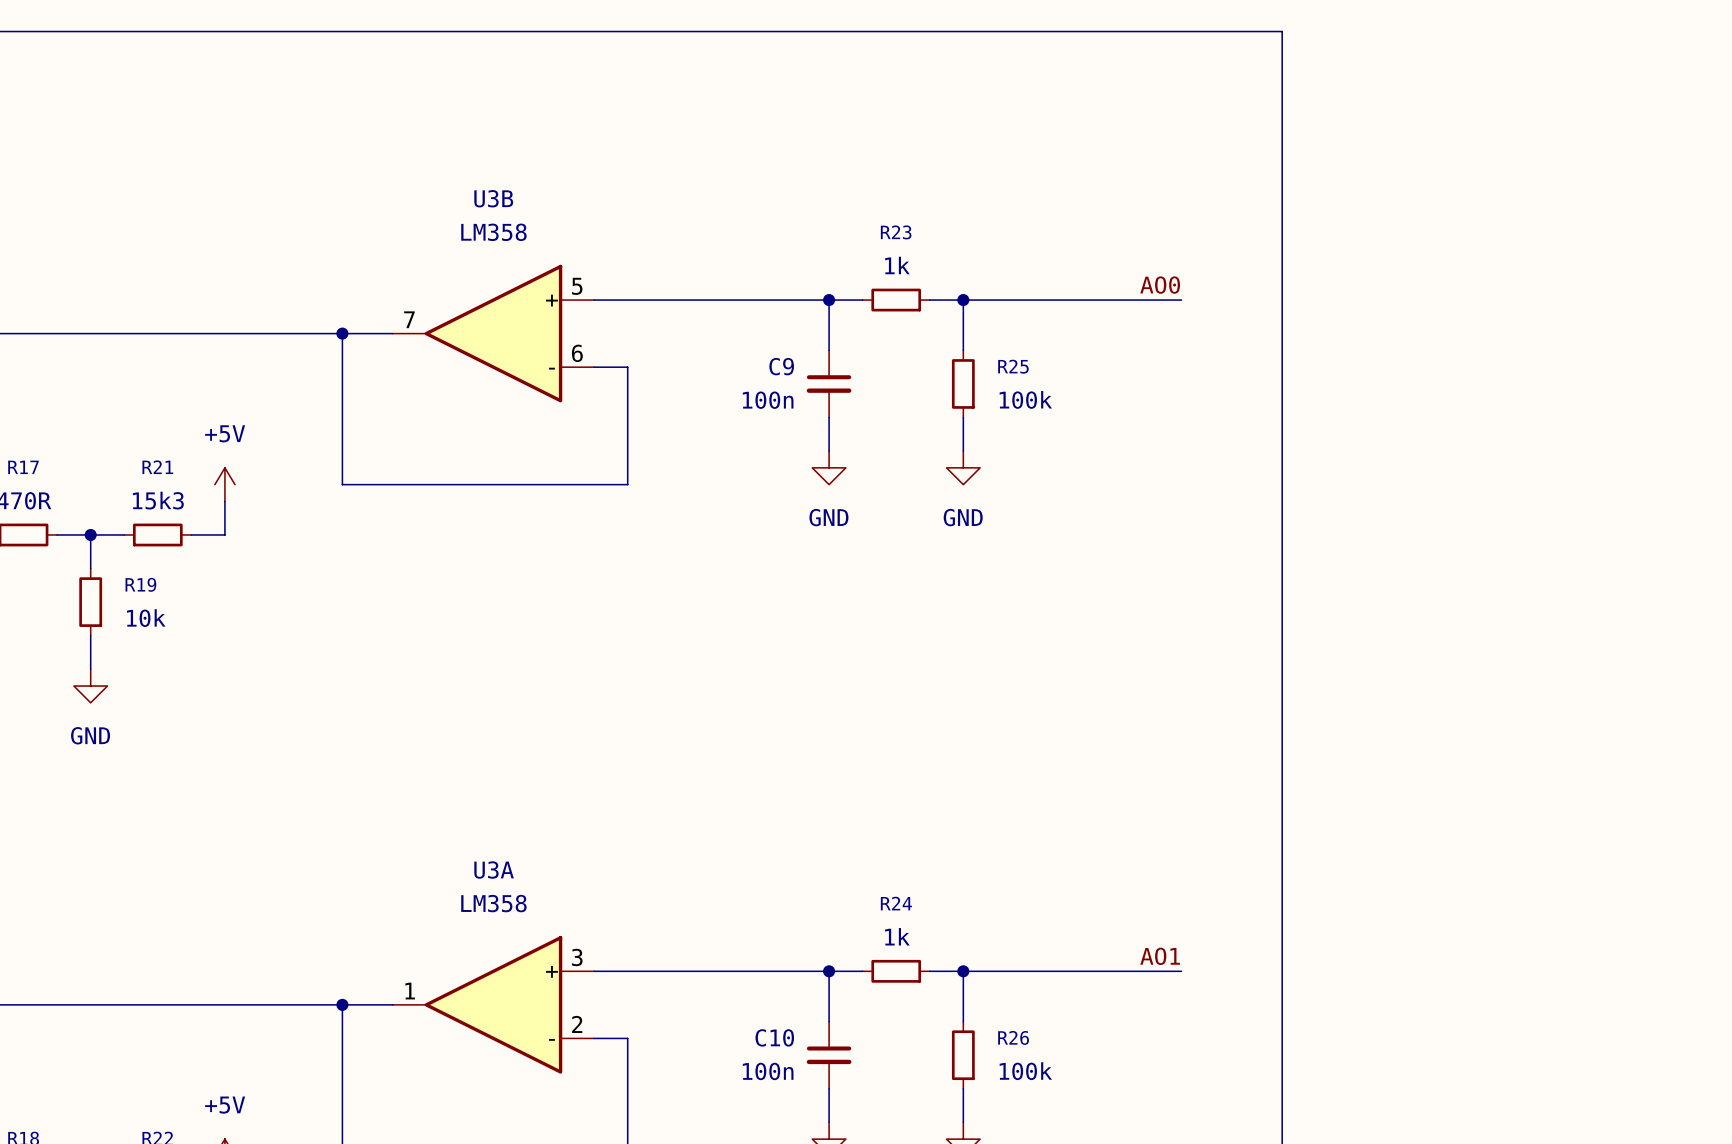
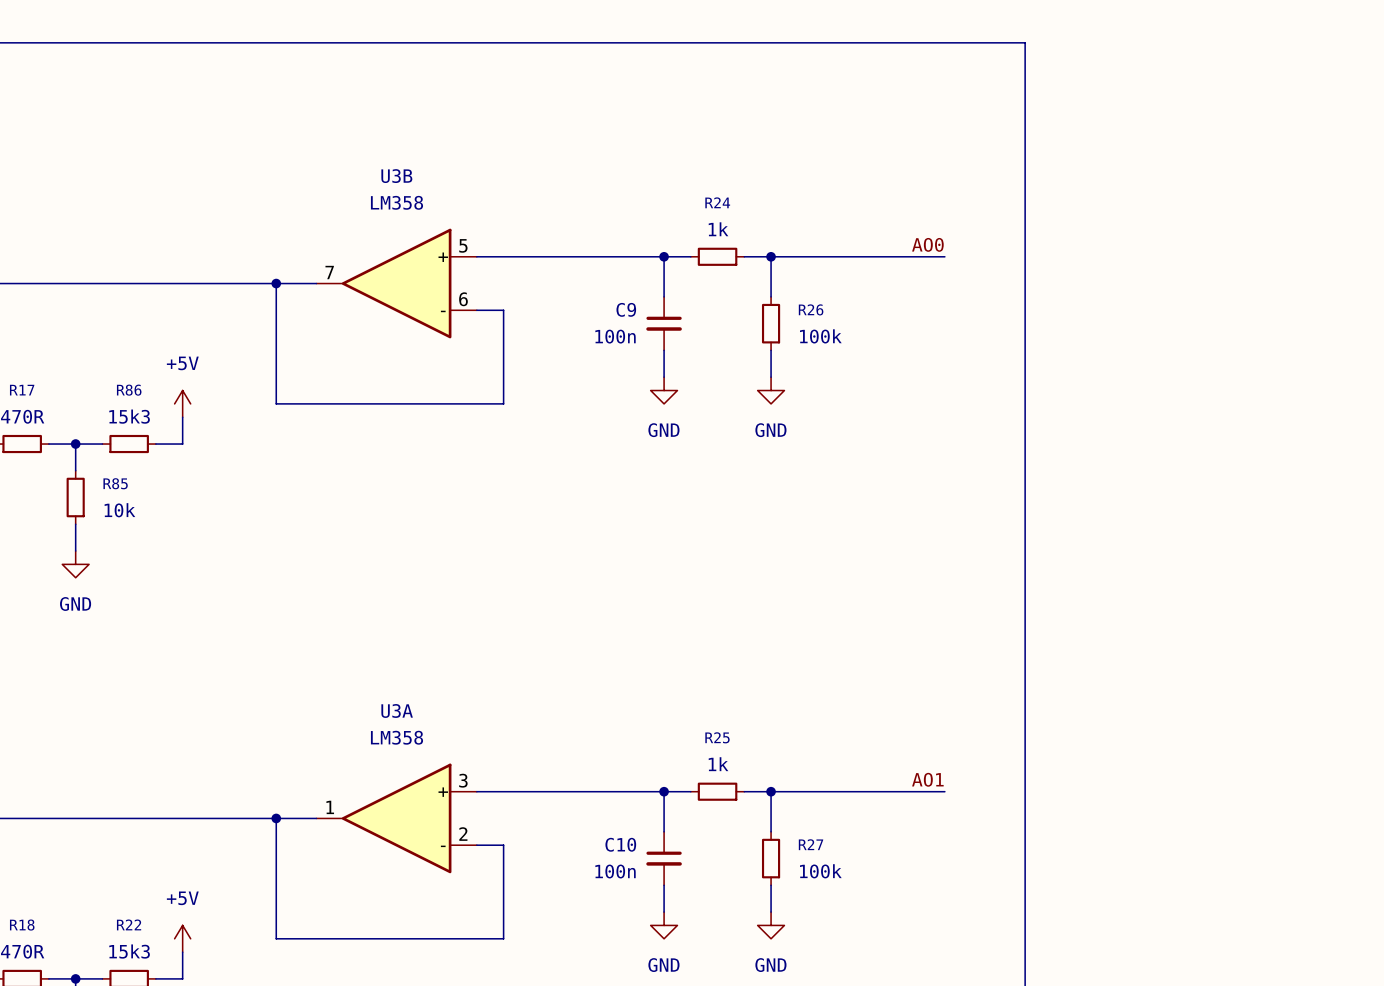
R23 name: R23 (896, 232) -> R24 (717, 202)
R25 name: R25 (1013, 366) -> R26 (811, 309)
R21 name: R21 (157, 467) -> R86 (129, 390)
R19 name: R19 (140, 584) -> R85 (115, 483)
R24 name: R24 (896, 903) -> R25 (717, 737)
R26 name: R26 (1013, 1037) -> R27 (811, 844)

